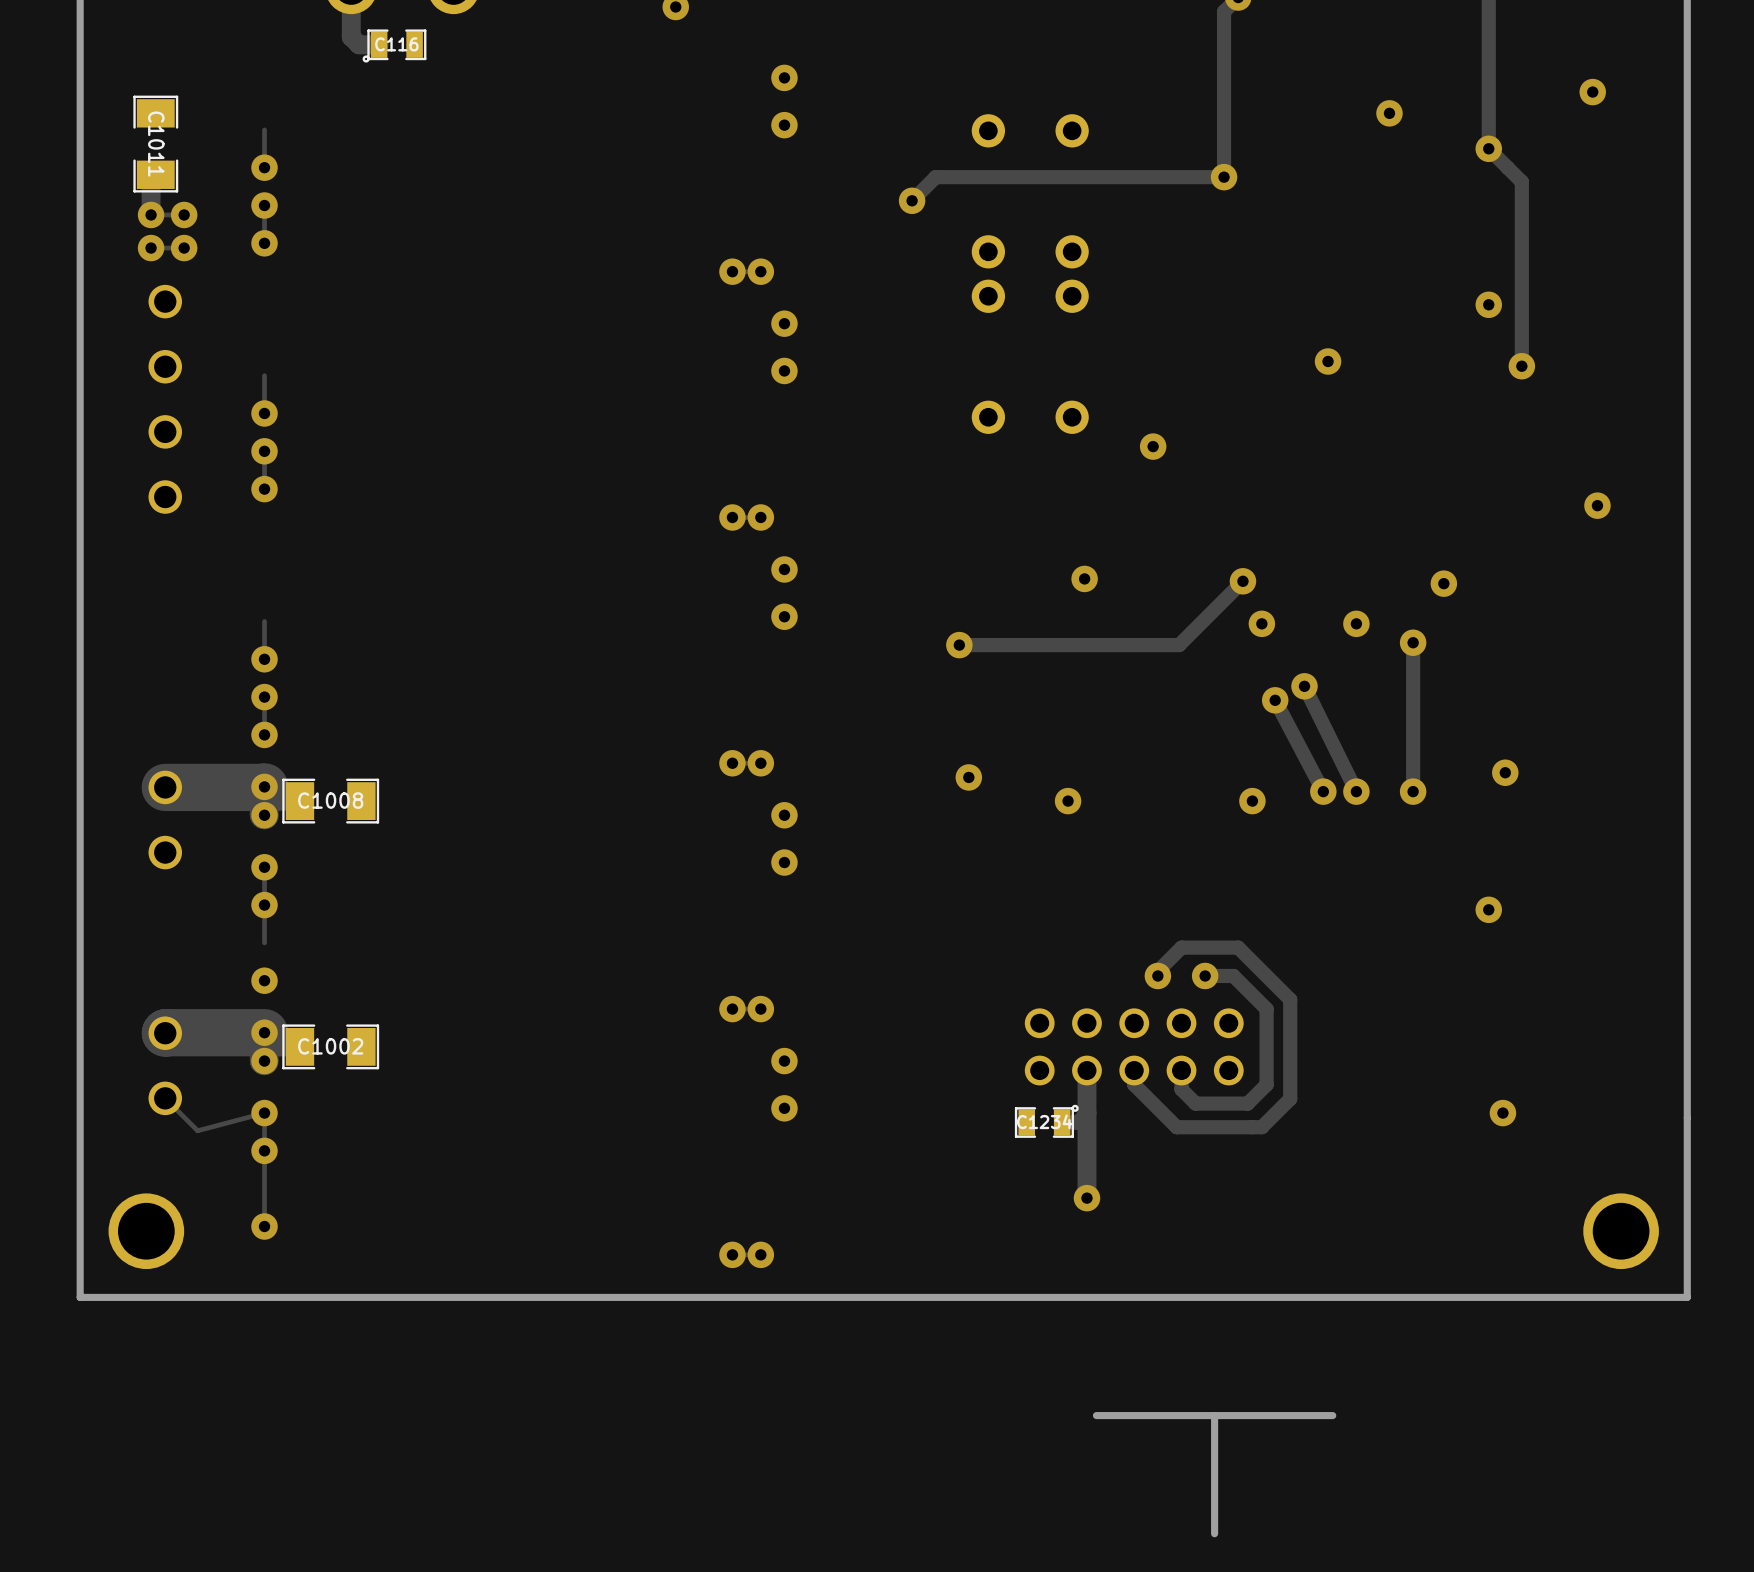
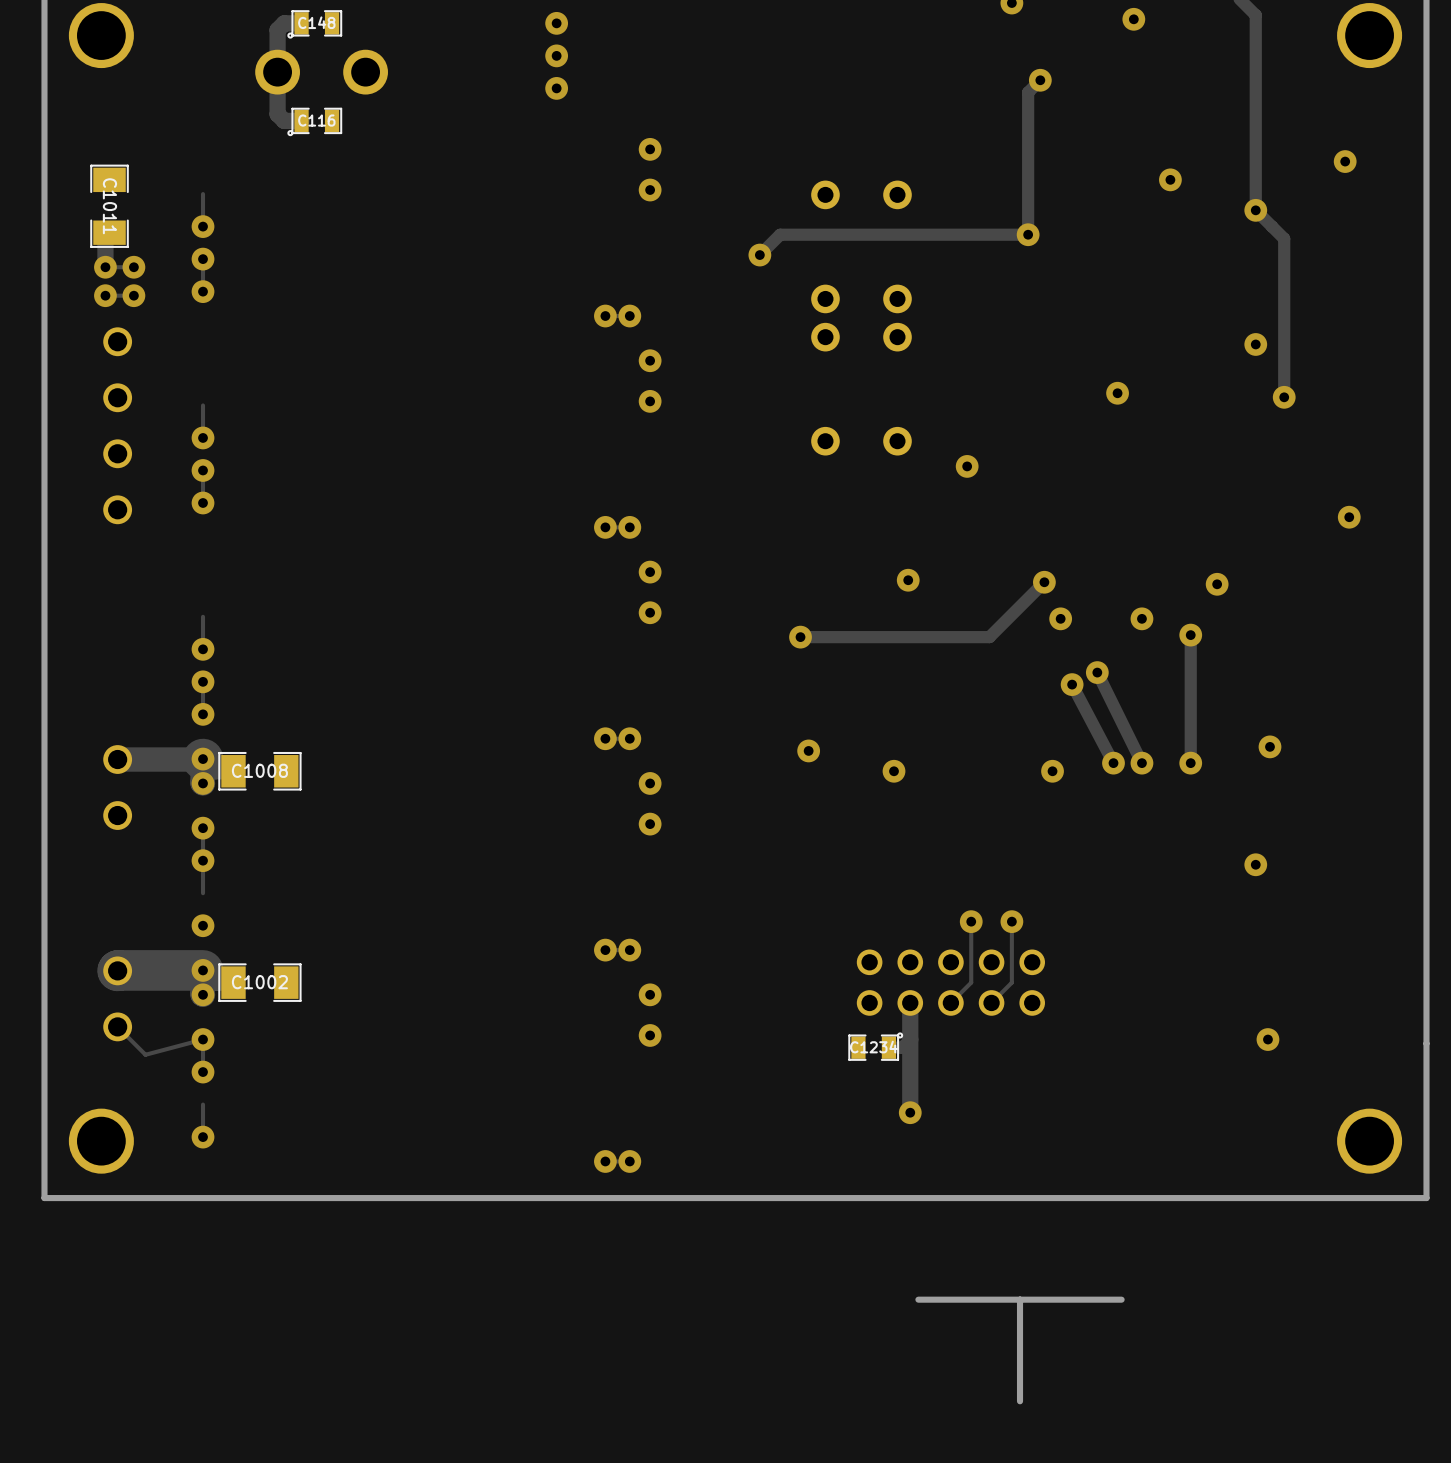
track width: thick (264, 787) (165, 787) -> thin (202, 759) (117, 759)
track: (1157, 975) (1157, 971) (1181, 947) (1238, 947) (1290, 999) (1290, 1098) (1261, 1127) (1176, 1127) (1134, 1084) (1134, 1070) -> (971, 921) (971, 982) (950, 1002)
track: (1205, 975) (1233, 975) (1266, 1009) (1266, 1084) (1247, 1103) (1195, 1103) (1181, 1089) (1181, 1070) -> (1011, 921) (1011, 982) (991, 1002)
track: (264, 1150) (264, 1188) -> none

